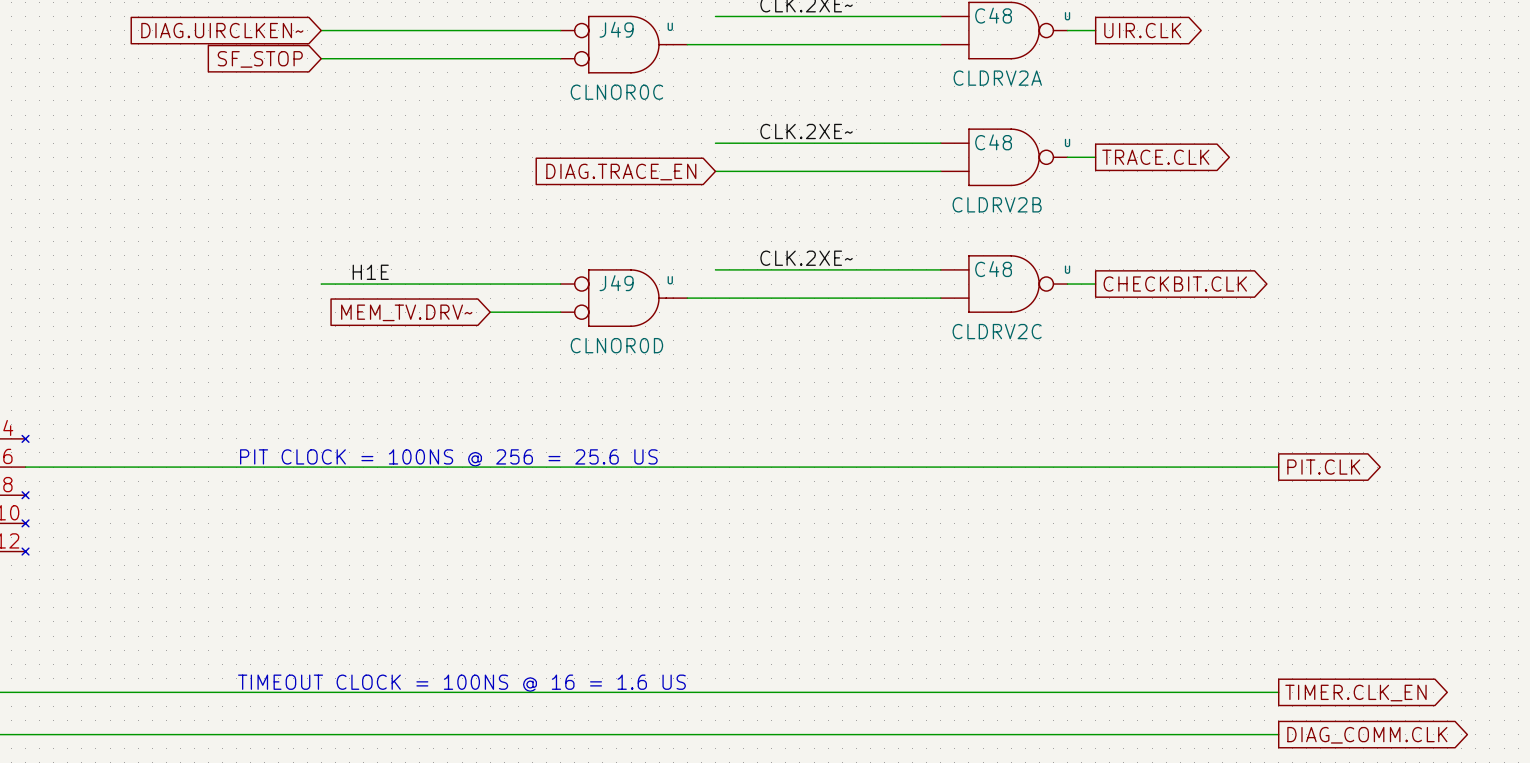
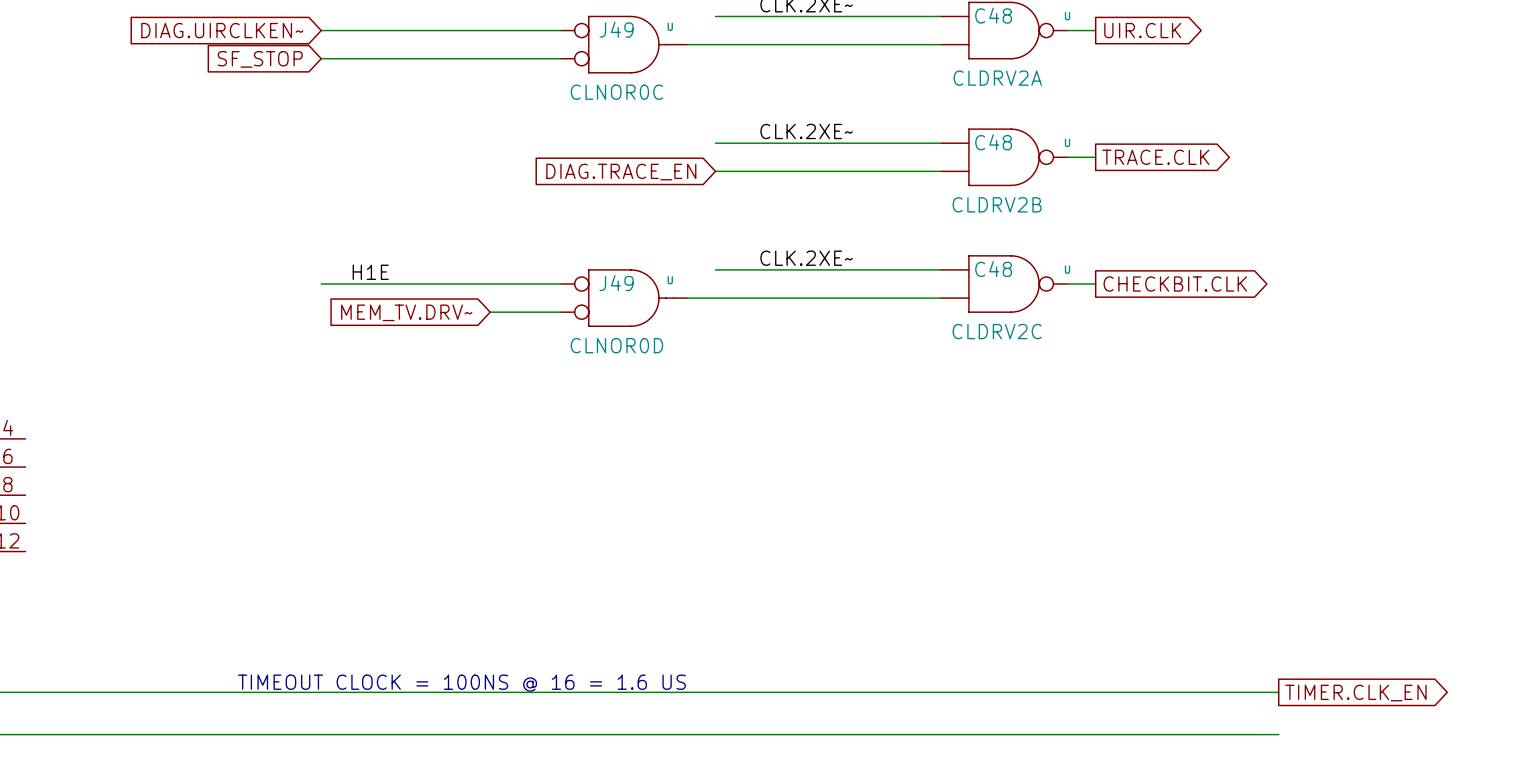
no-connect mark: (25, 438) -> none
text: PIT CLOCK = 100NS @ 256 = 25.6 US (448, 457) -> none
wire: (25, 467) (1278, 467) -> none
global label: PIT.CLK (1323, 467) -> none
no-connect mark: (25, 495) -> none
no-connect mark: (25, 523) -> none
no-connect mark: (25, 551) -> none
global label: DIAG_COMM.CLK (1367, 735) -> none

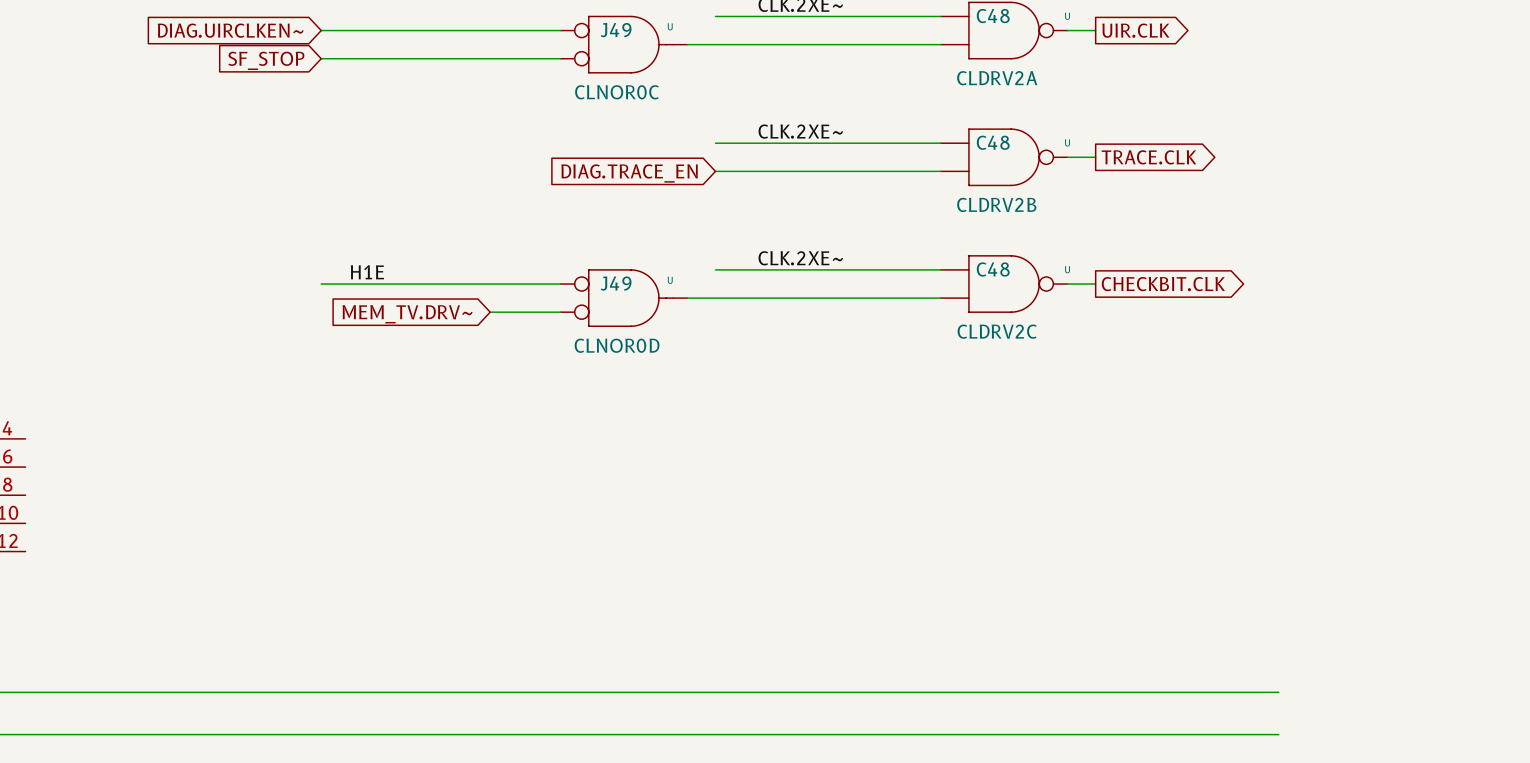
text: TIMEOUT CLOCK = 100NS @ 16 = 1.6 US (461, 683) -> none
global label: TIMER.CLK_EN (1355, 693) -> none

